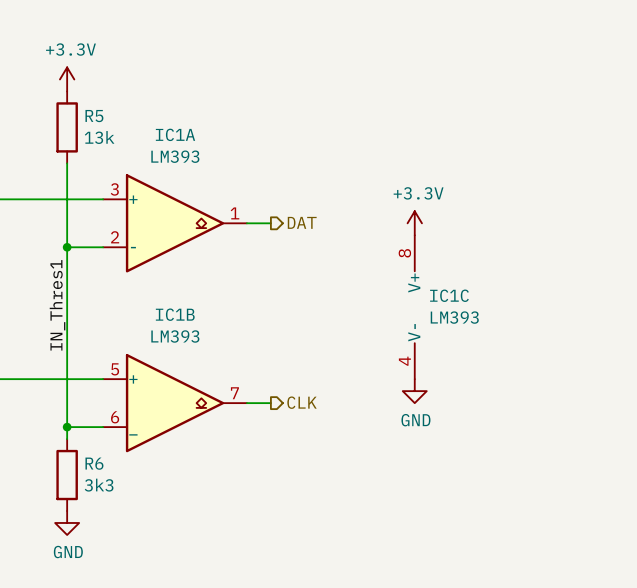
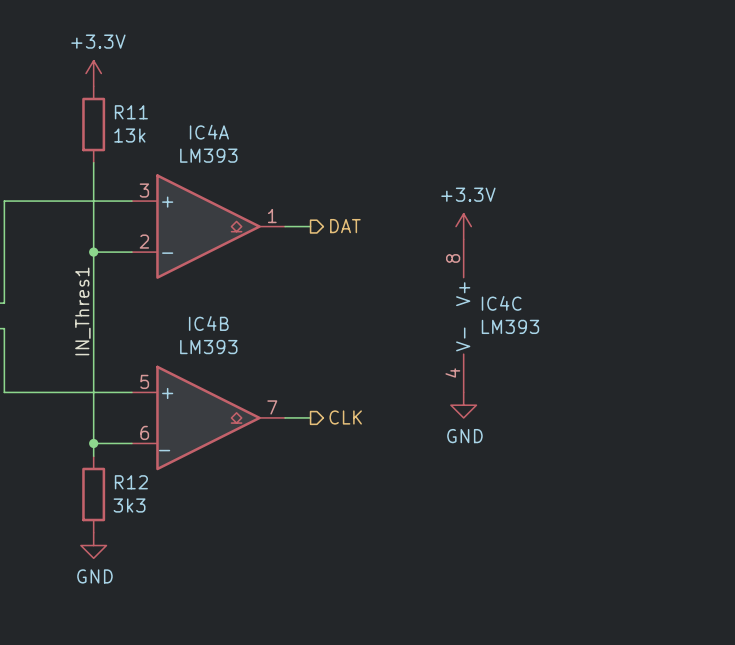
R5 name: R5 (94, 116) -> R11 (131, 112)
IC1A name: IC1A (175, 134) -> IC4A (209, 132)
IC1C name: IC1C (449, 295) -> IC4C (501, 303)
IC1B name: IC1B (175, 314) -> IC4B (208, 323)
R6 name: R6 (94, 463) -> R12 (131, 482)

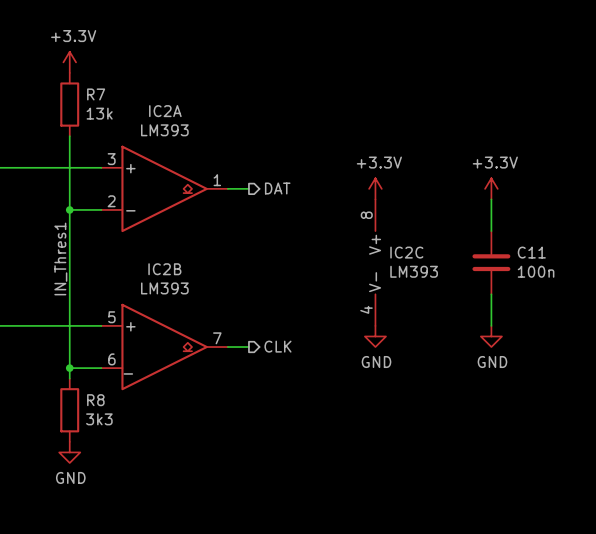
R11 name: R11 (131, 112) -> R7 (96, 94)
IC4A name: IC4A (209, 132) -> IC2A (165, 111)
power symbol: none -> +3.3V (491, 188)
wire: none -> (491, 199) (491, 231)
IC4C name: IC4C (501, 303) -> IC2C (406, 252)
C11: none -> 100n (491, 262)
IC4B name: IC4B (208, 323) -> IC2B (164, 269)
wire: none -> (491, 294) (491, 325)
power symbol: none -> GND (491, 336)
R12 name: R12 (131, 482) -> R8 (95, 400)

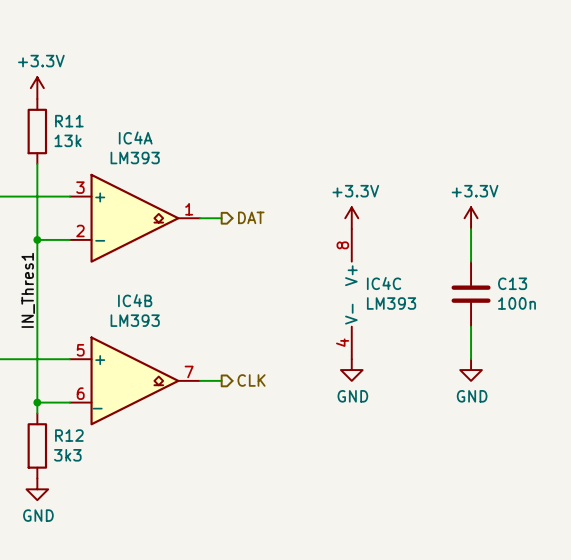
R7 name: R7 (96, 94) -> R11 (69, 121)
IC2A name: IC2A (165, 111) -> IC4A (135, 138)
IC2C name: IC2C (406, 252) -> IC4C (384, 283)
C11 name: C11 (531, 252) -> C13 (512, 283)
IC2B name: IC2B (164, 269) -> IC4B (135, 300)
R8 name: R8 (95, 400) -> R12 (69, 435)

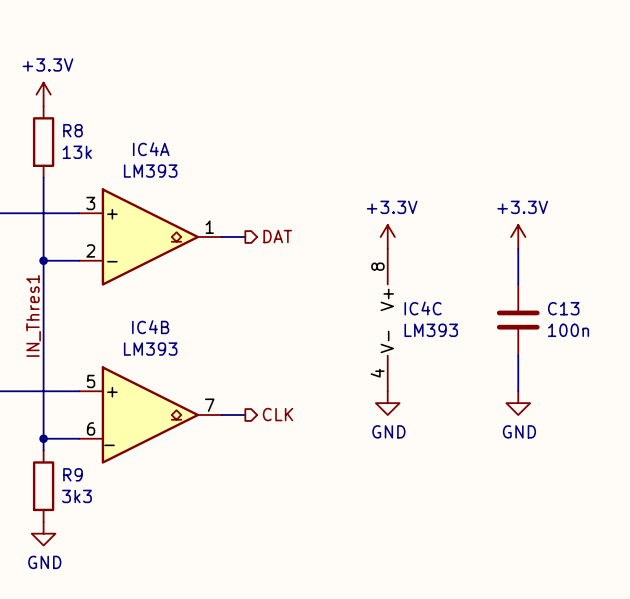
R11 name: R11 (69, 121) -> R8 (73, 130)
R12 name: R12 (69, 435) -> R9 (73, 474)

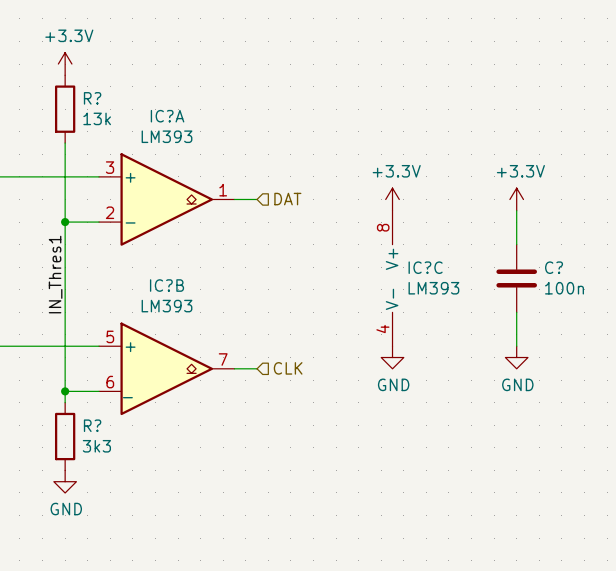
R8 name: R8 (73, 130) -> R? (92, 98)
IC4A name: IC4A (151, 149) -> IC?A (167, 116)
hierarchical label shape: output (277, 236) -> input (287, 199)
IC4C name: IC4C (423, 308) -> IC?C (425, 267)
C13 name: C13 (563, 308) -> C? (554, 267)
IC4B name: IC4B (150, 327) -> IC?B (167, 285)
hierarchical label shape: output (278, 414) -> input (288, 368)
R9 name: R9 (73, 474) -> R? (92, 425)

